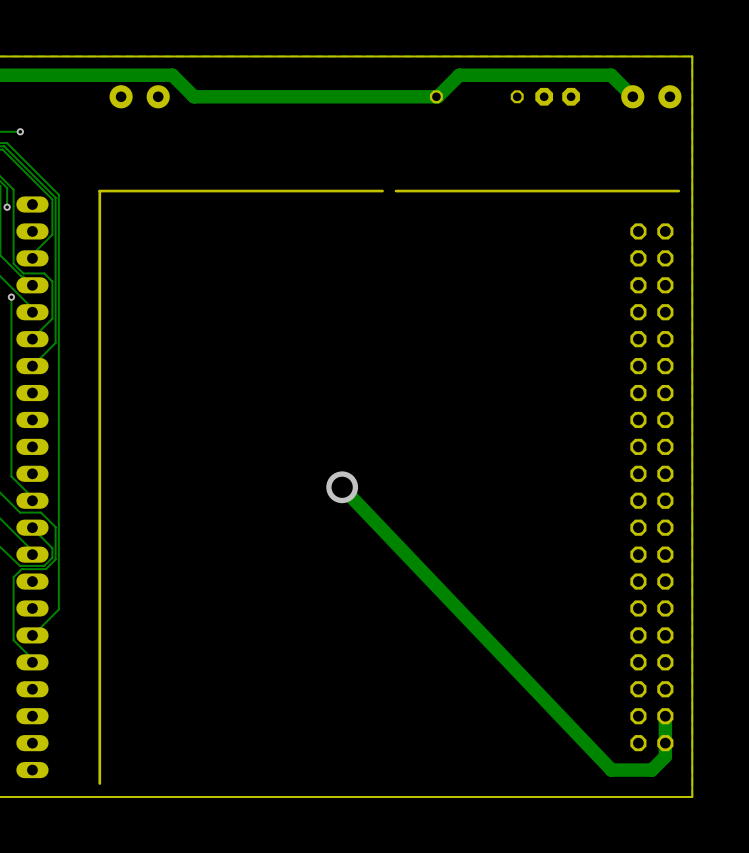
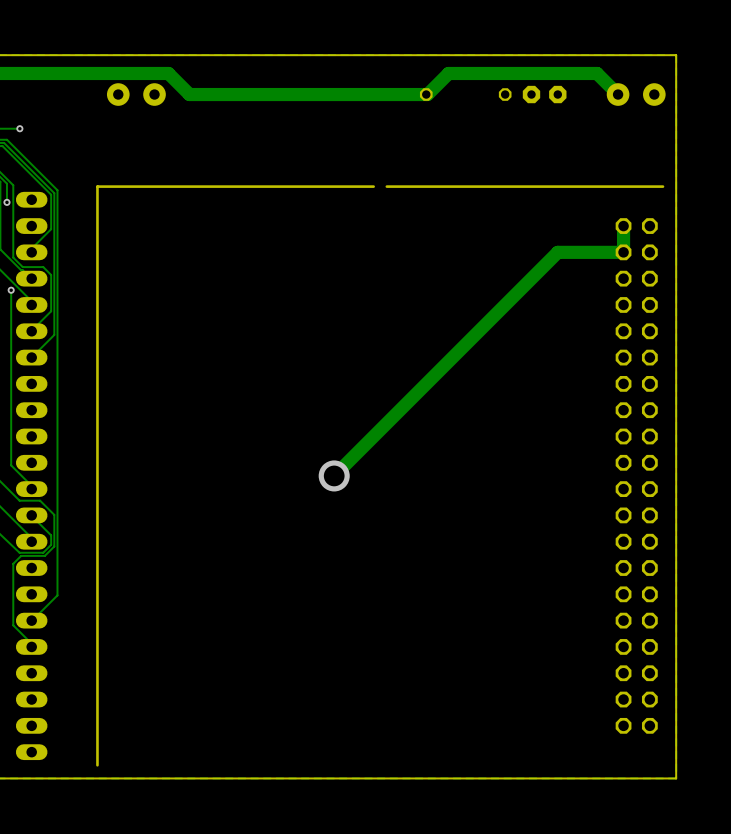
track: (342, 487) (611, 770) (651, 770) (665, 756) (665, 716) -> (334, 475) (557, 252) (623, 252) (623, 226)

